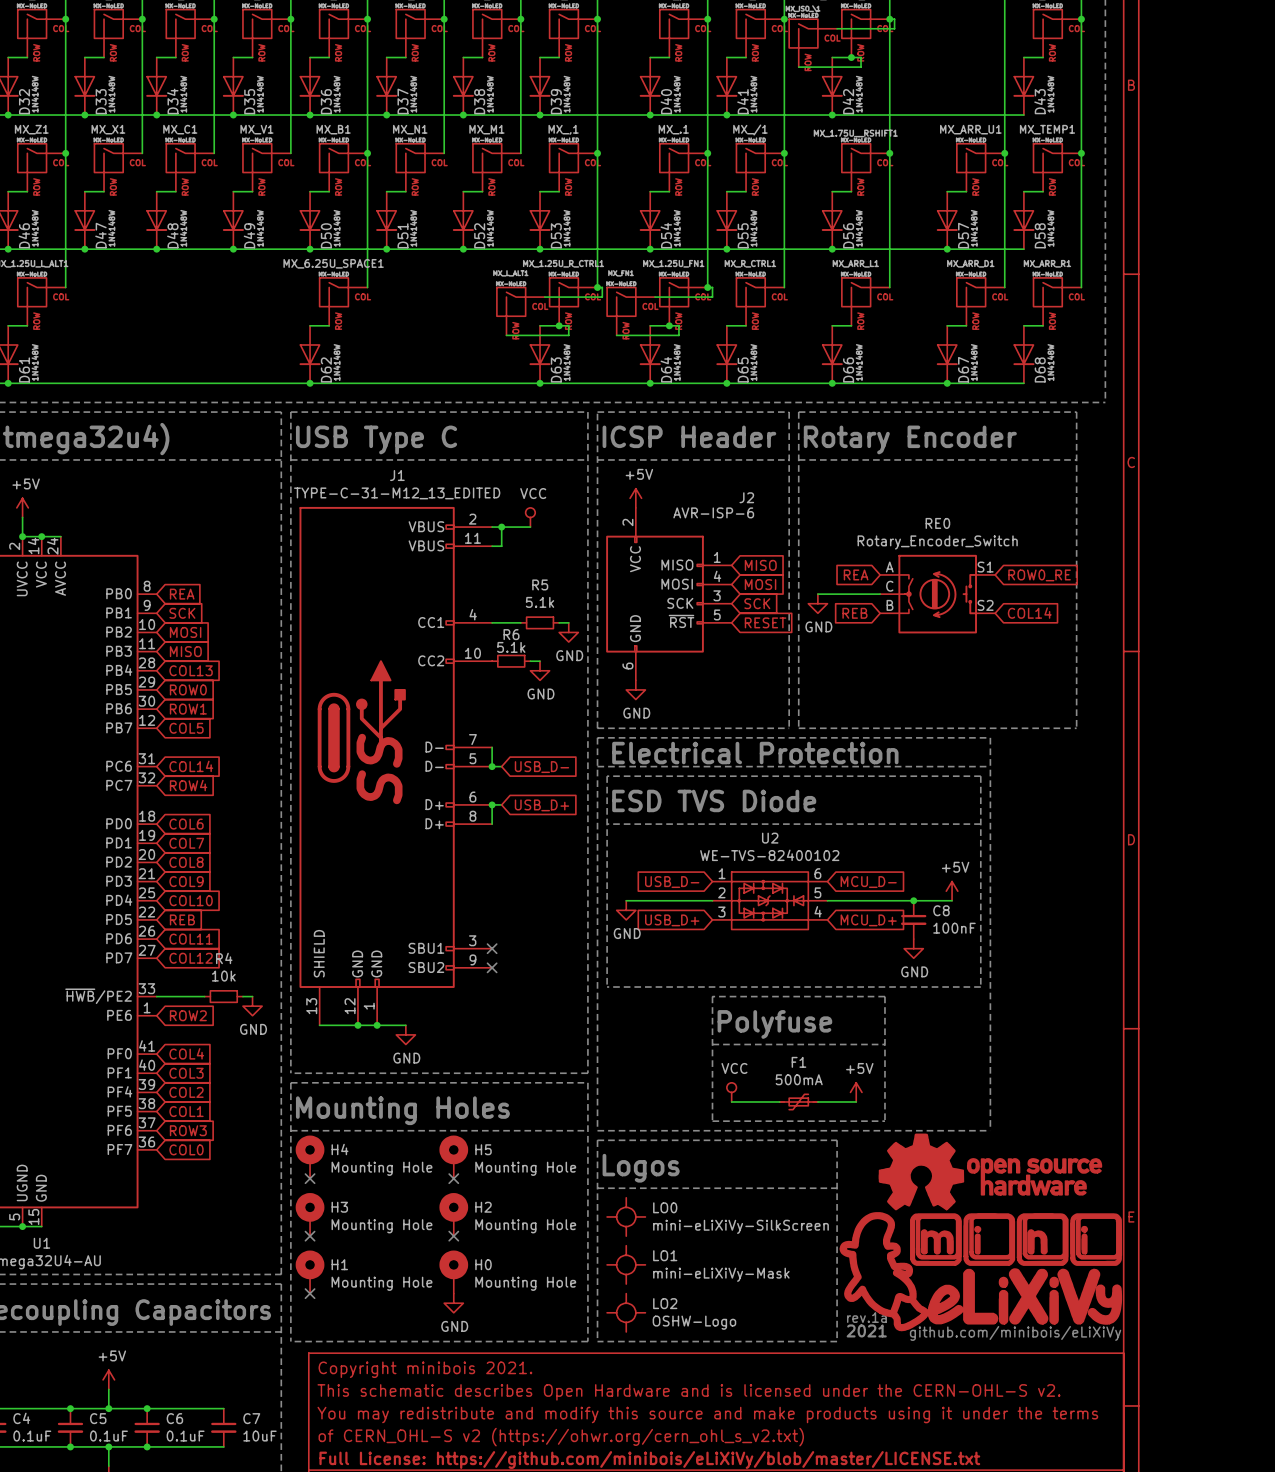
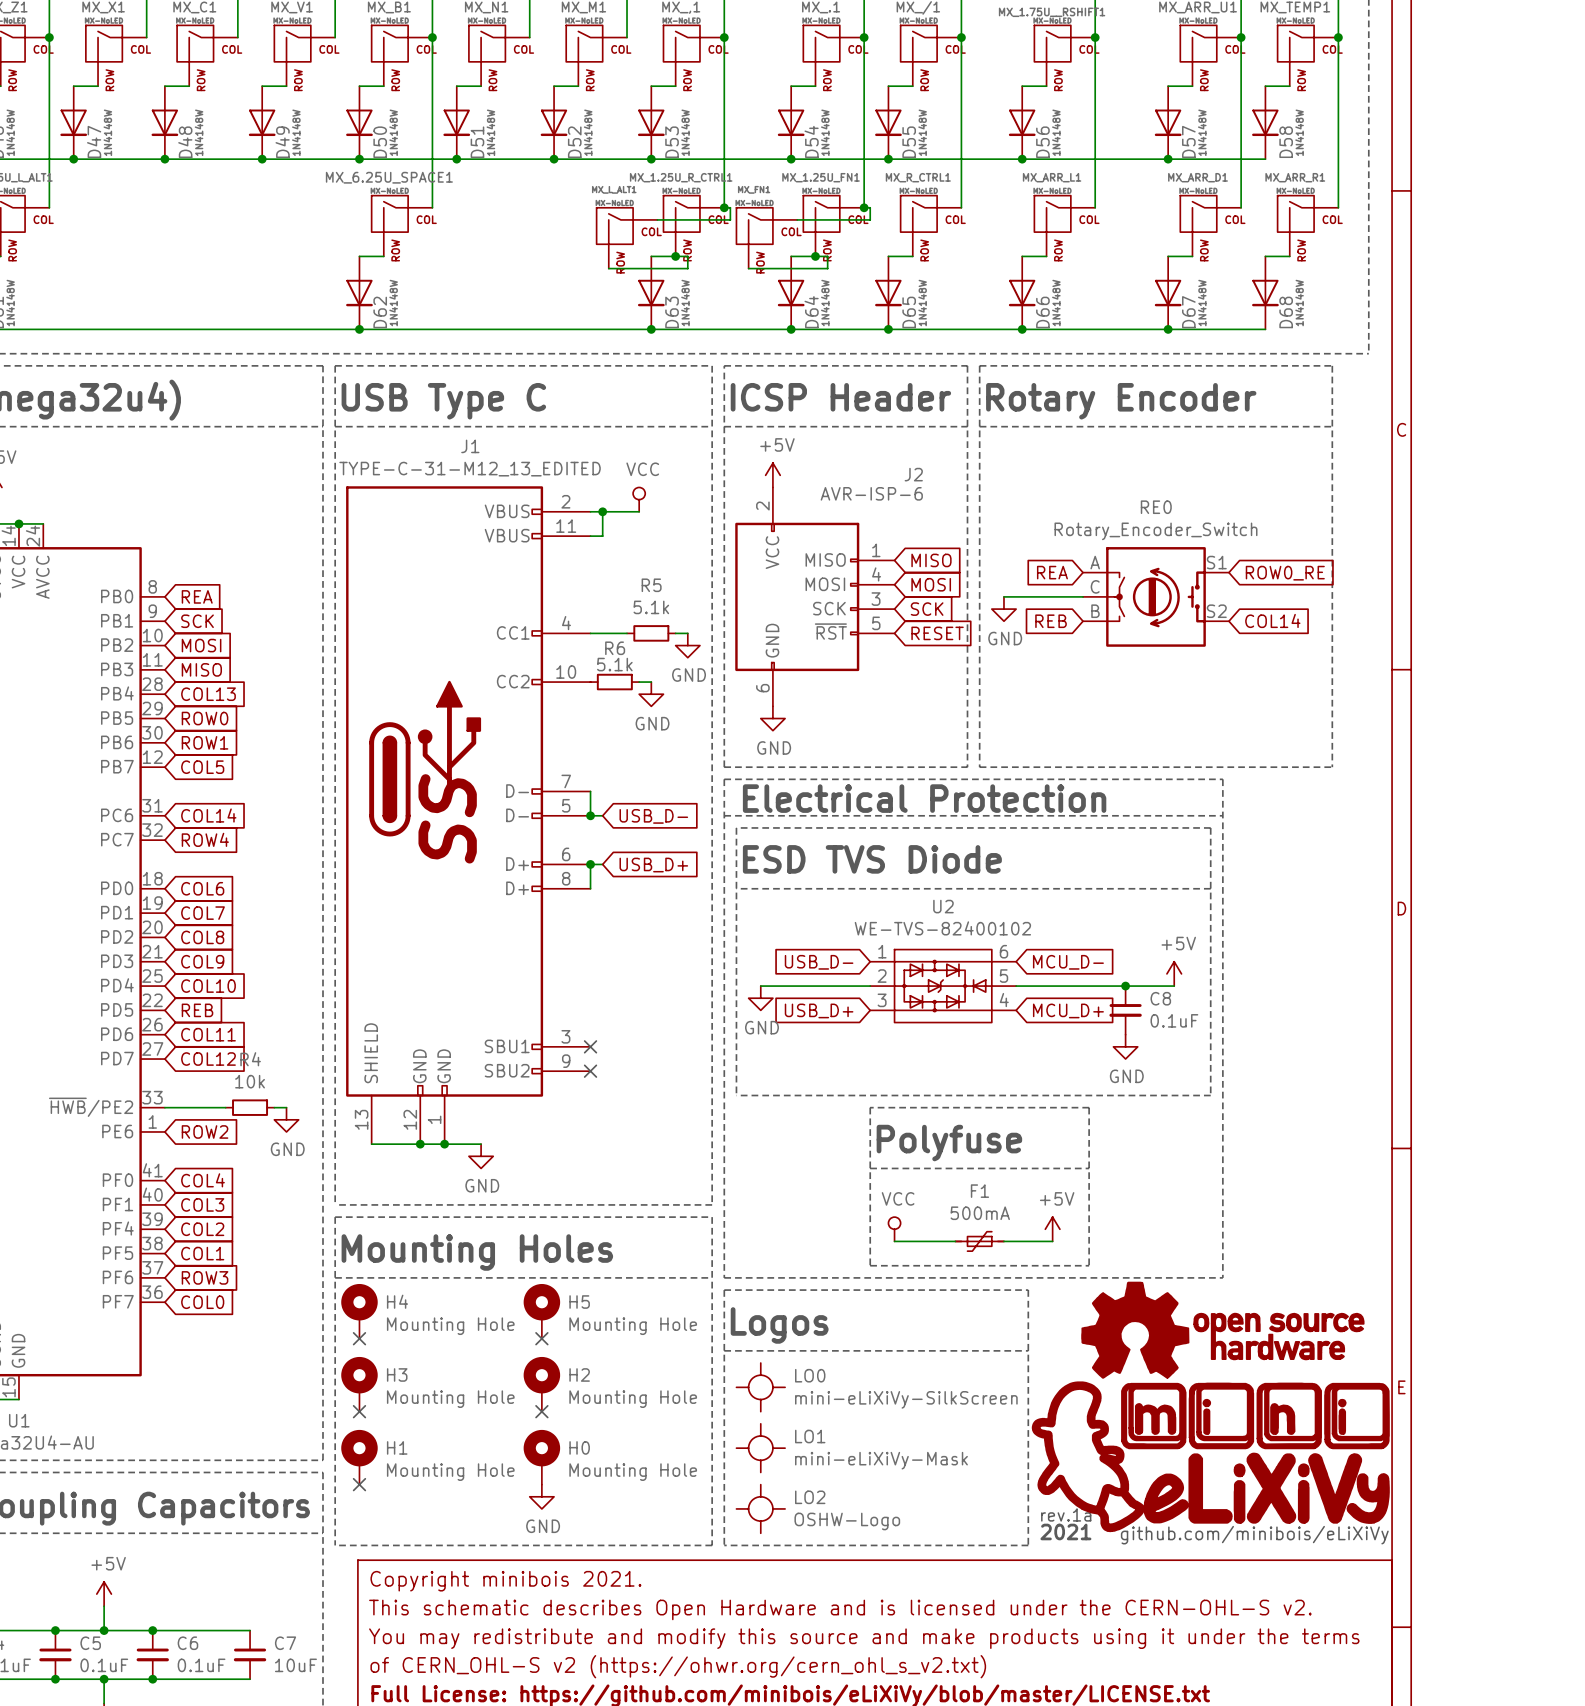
C8 value: 100nF (954, 928) -> 0.1uF (1174, 1020)

